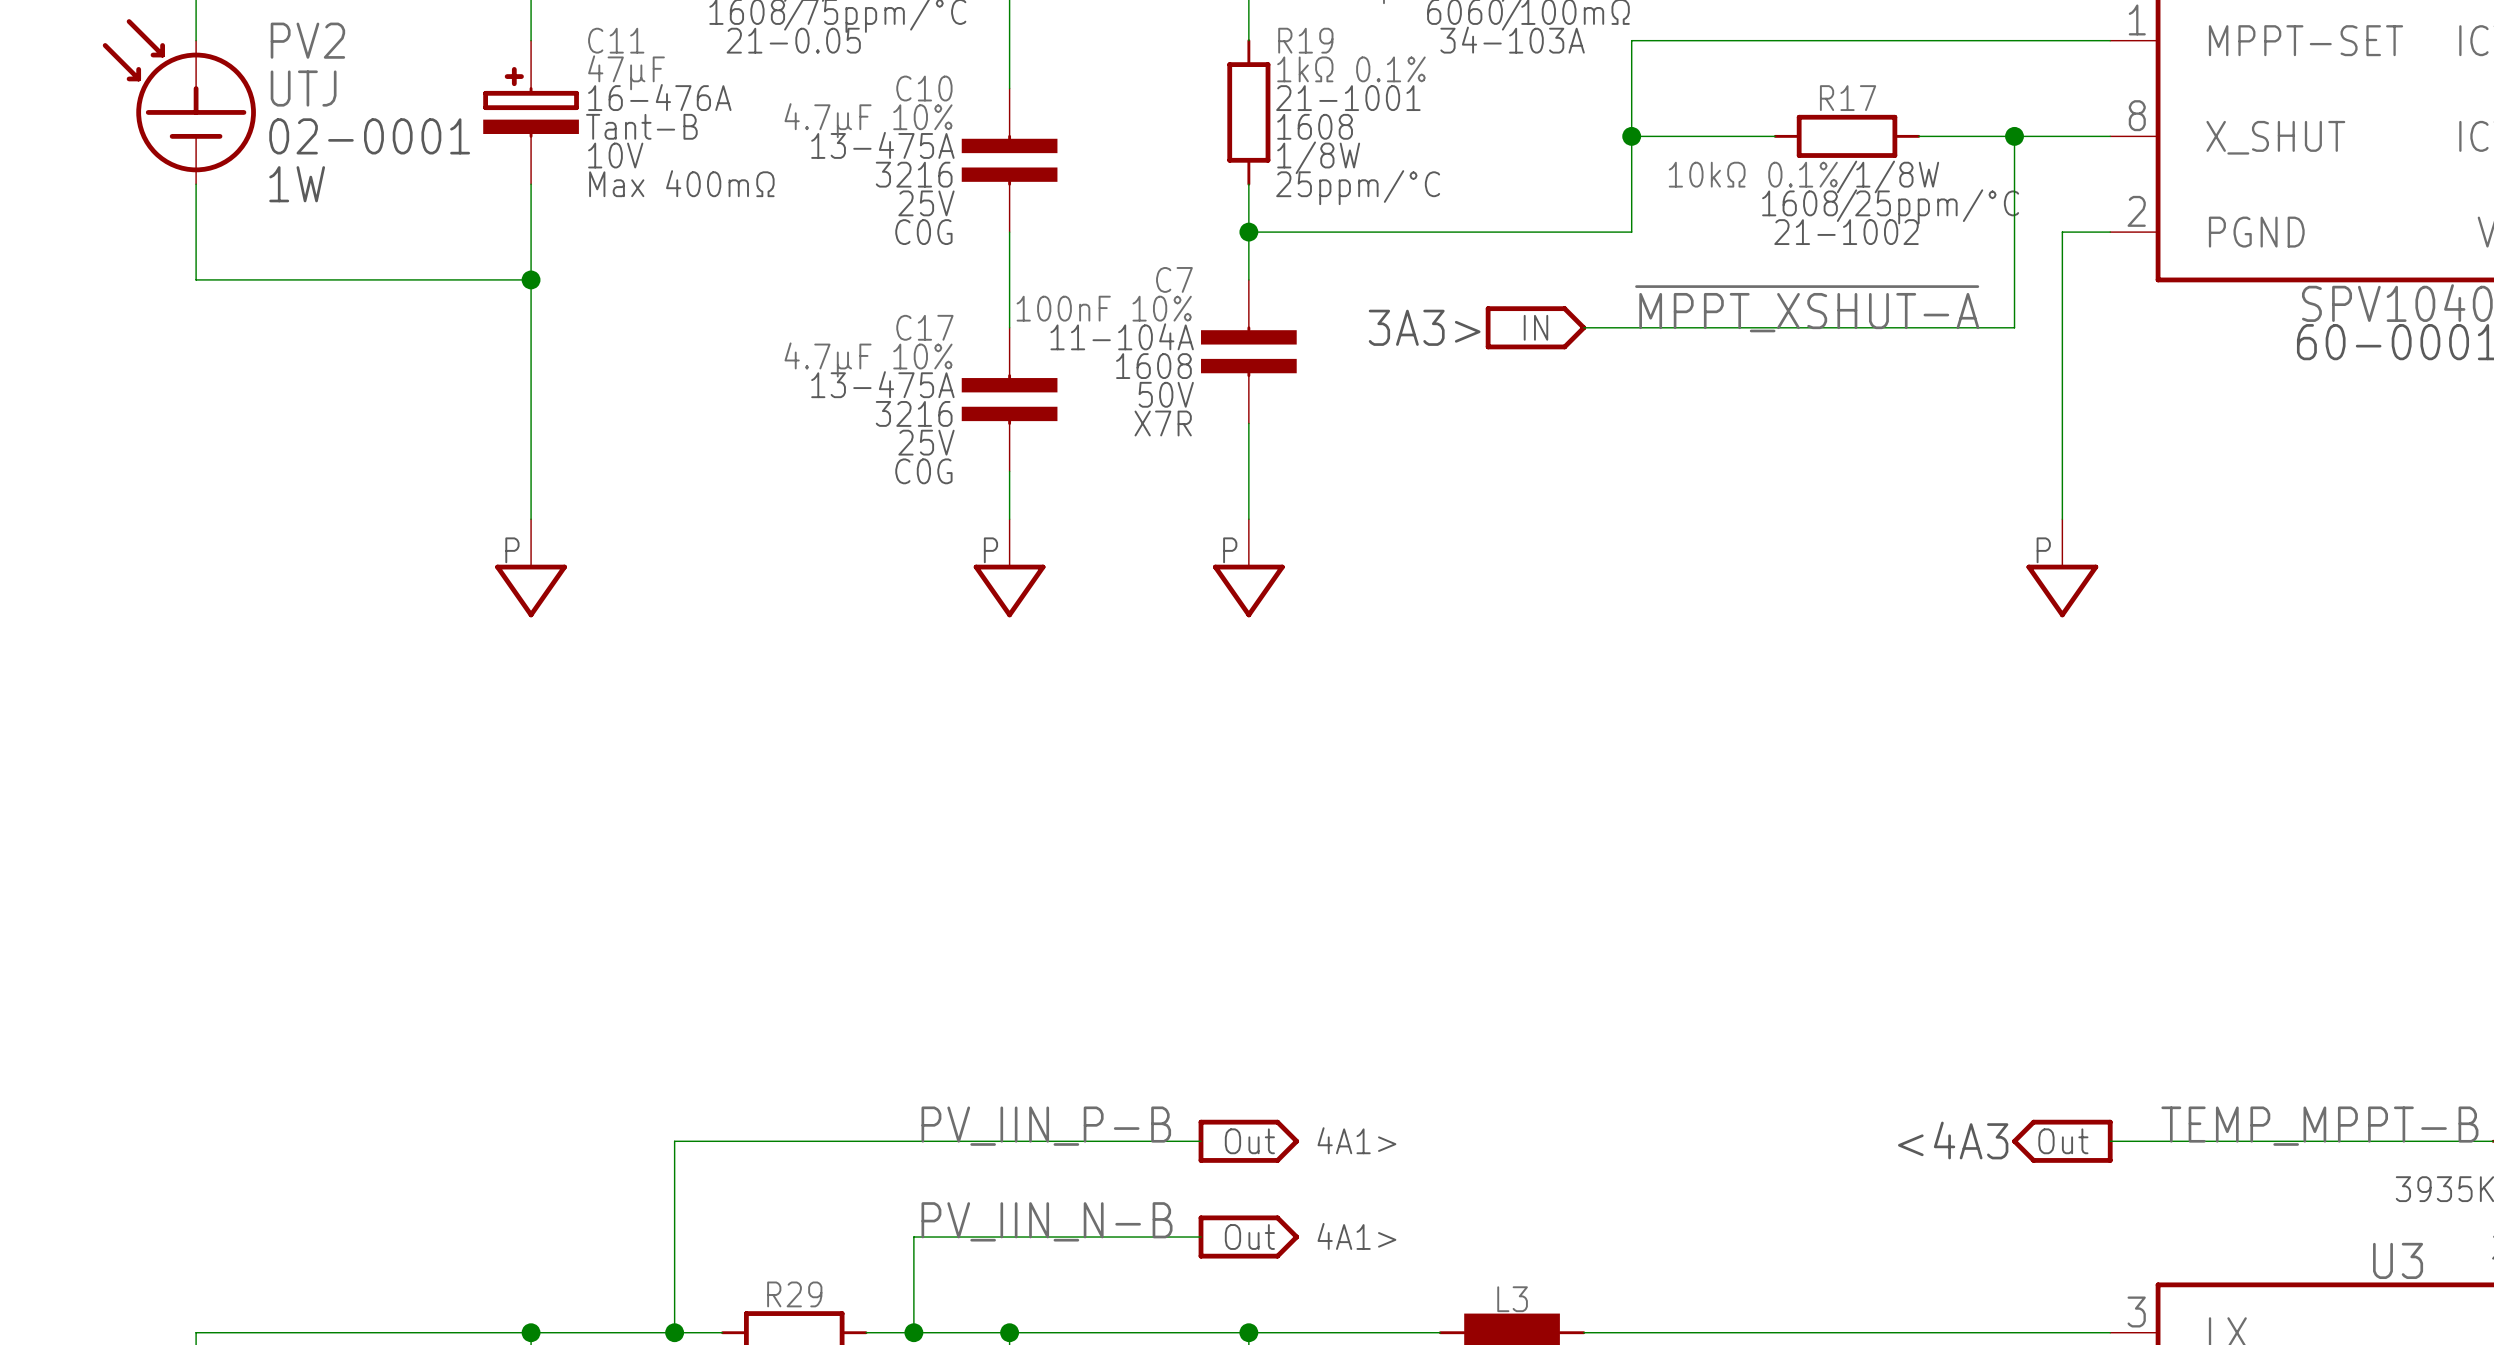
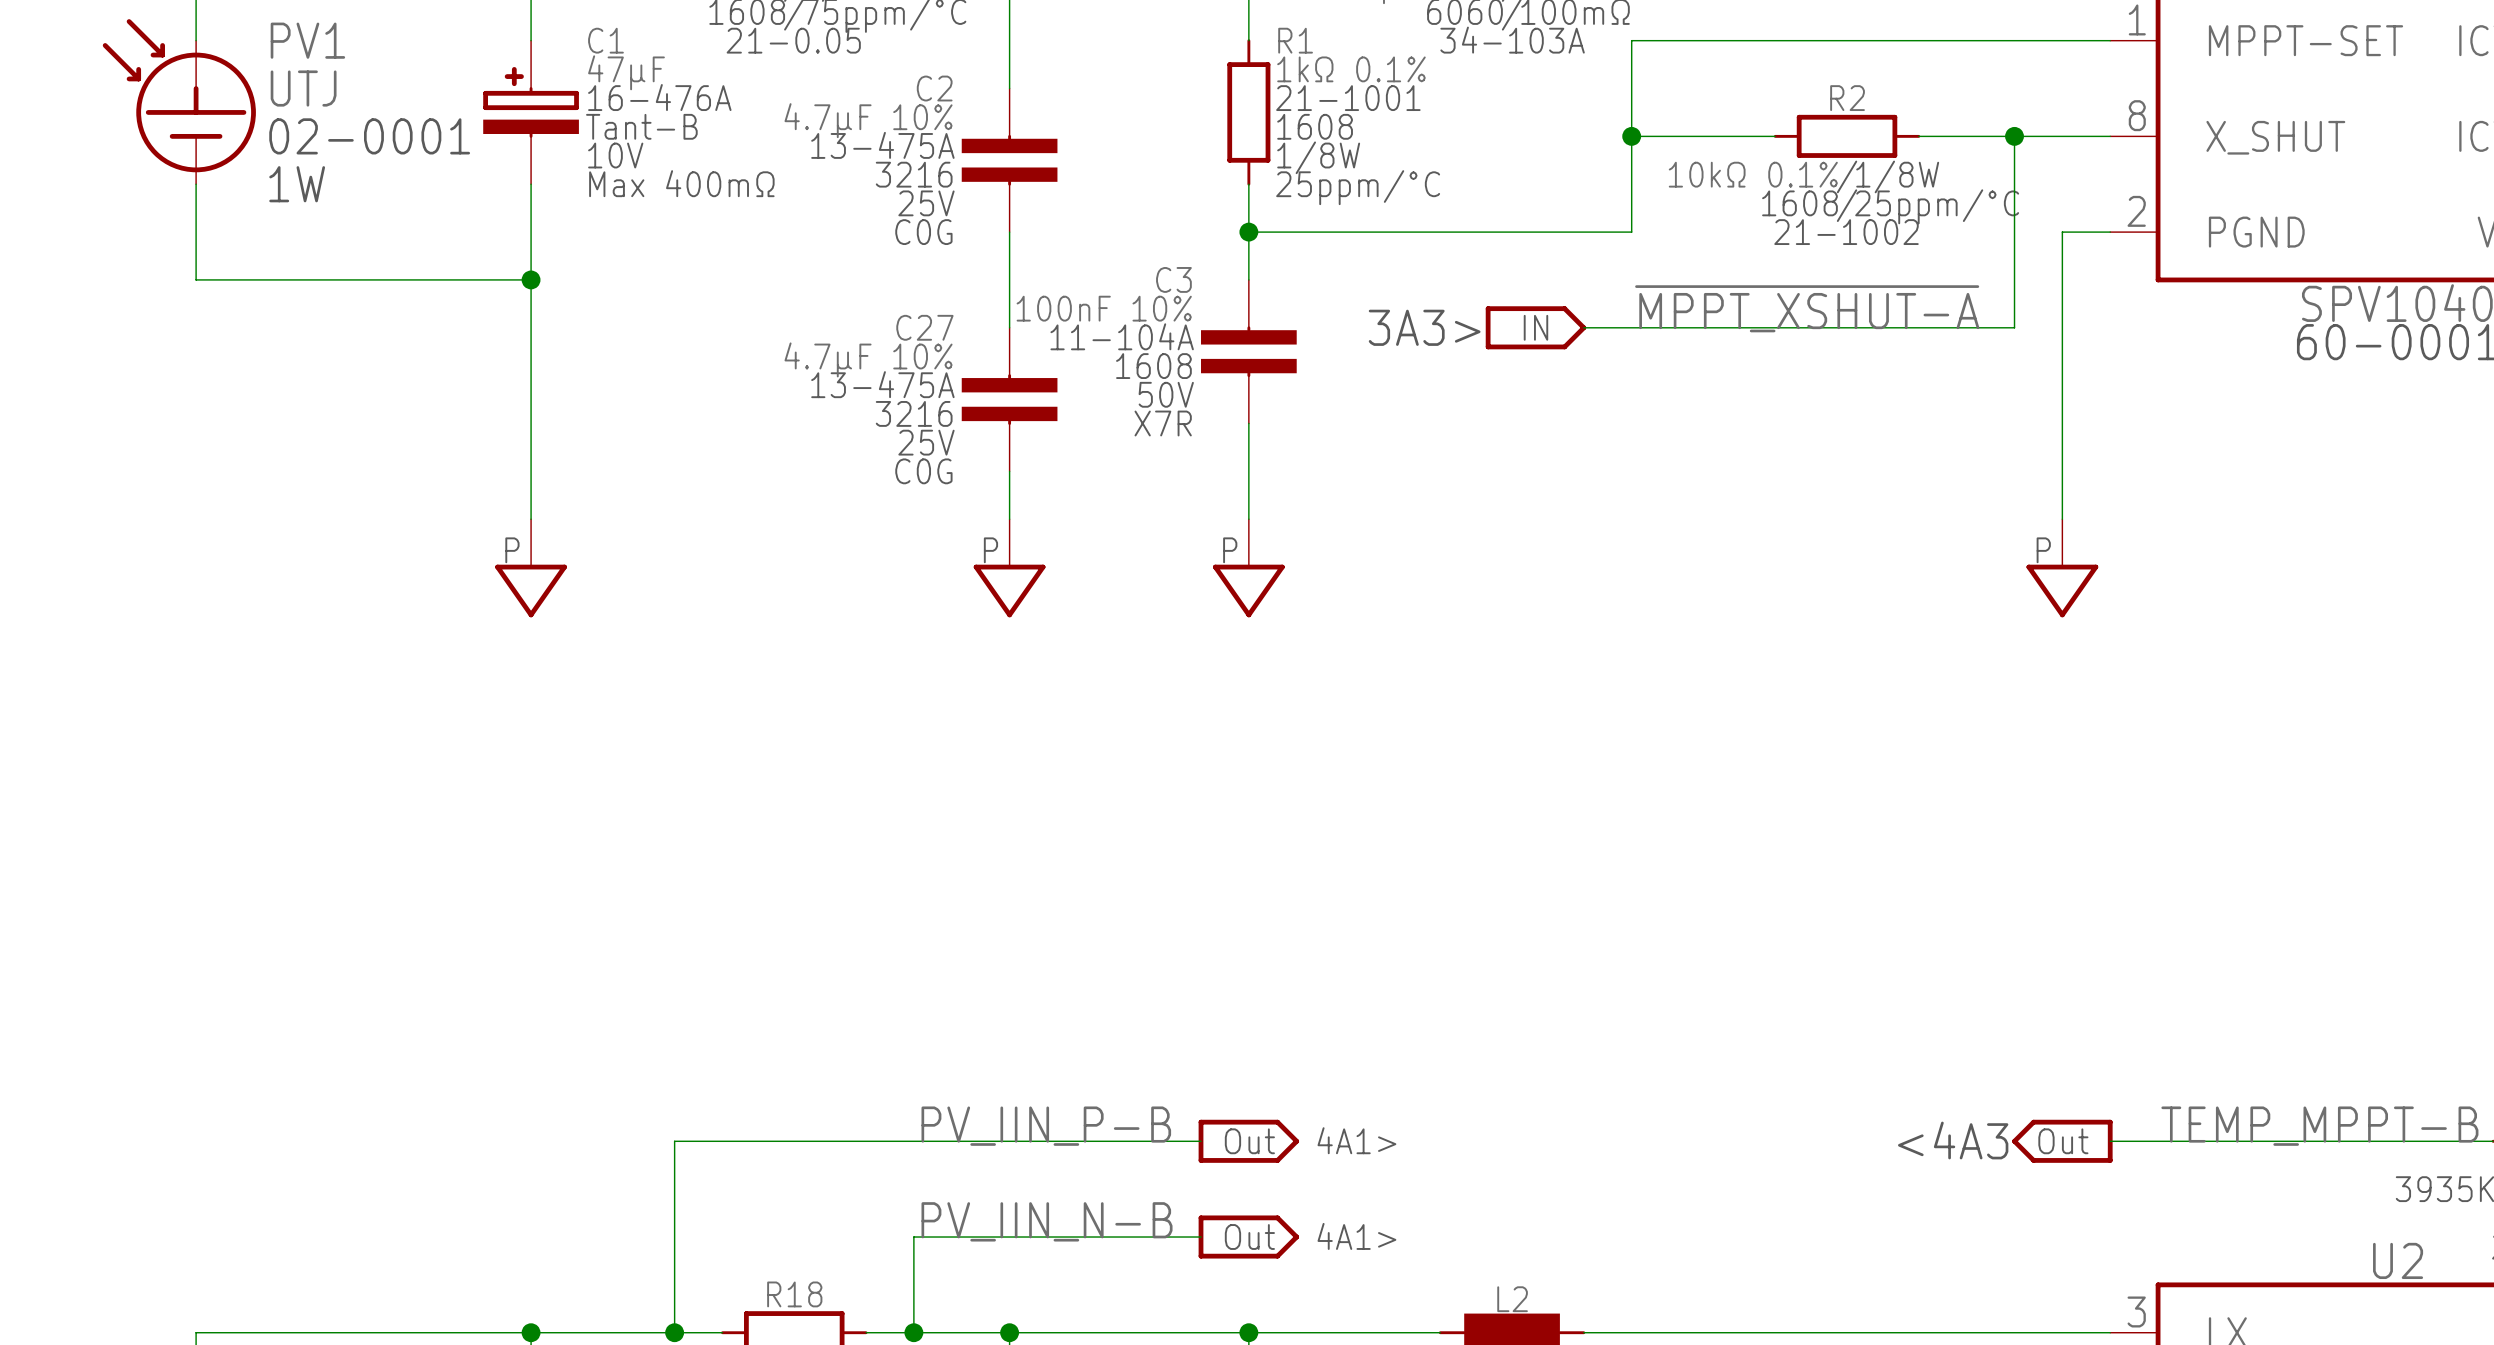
PV2 name: PV2 (307, 40) -> PV1 (307, 40)
C11 name: C11 (616, 40) -> C1 (605, 40)
R19 name: R19 (1305, 40) -> R1 (1295, 40)
C10 name: C10 (924, 88) -> C2 (934, 88)
R17 name: R17 (1848, 98) -> R2 (1847, 98)
C7 name: C7 (1174, 279) -> C3 (1173, 279)
C17 name: C17 (924, 327) -> C27 (924, 327)
U3 name: U3 (2398, 1260) -> U2 (2398, 1260)
R29 name: R29 (794, 1294) -> R18 (794, 1294)
L3 name: L3 (1512, 1299) -> L2 (1512, 1299)

